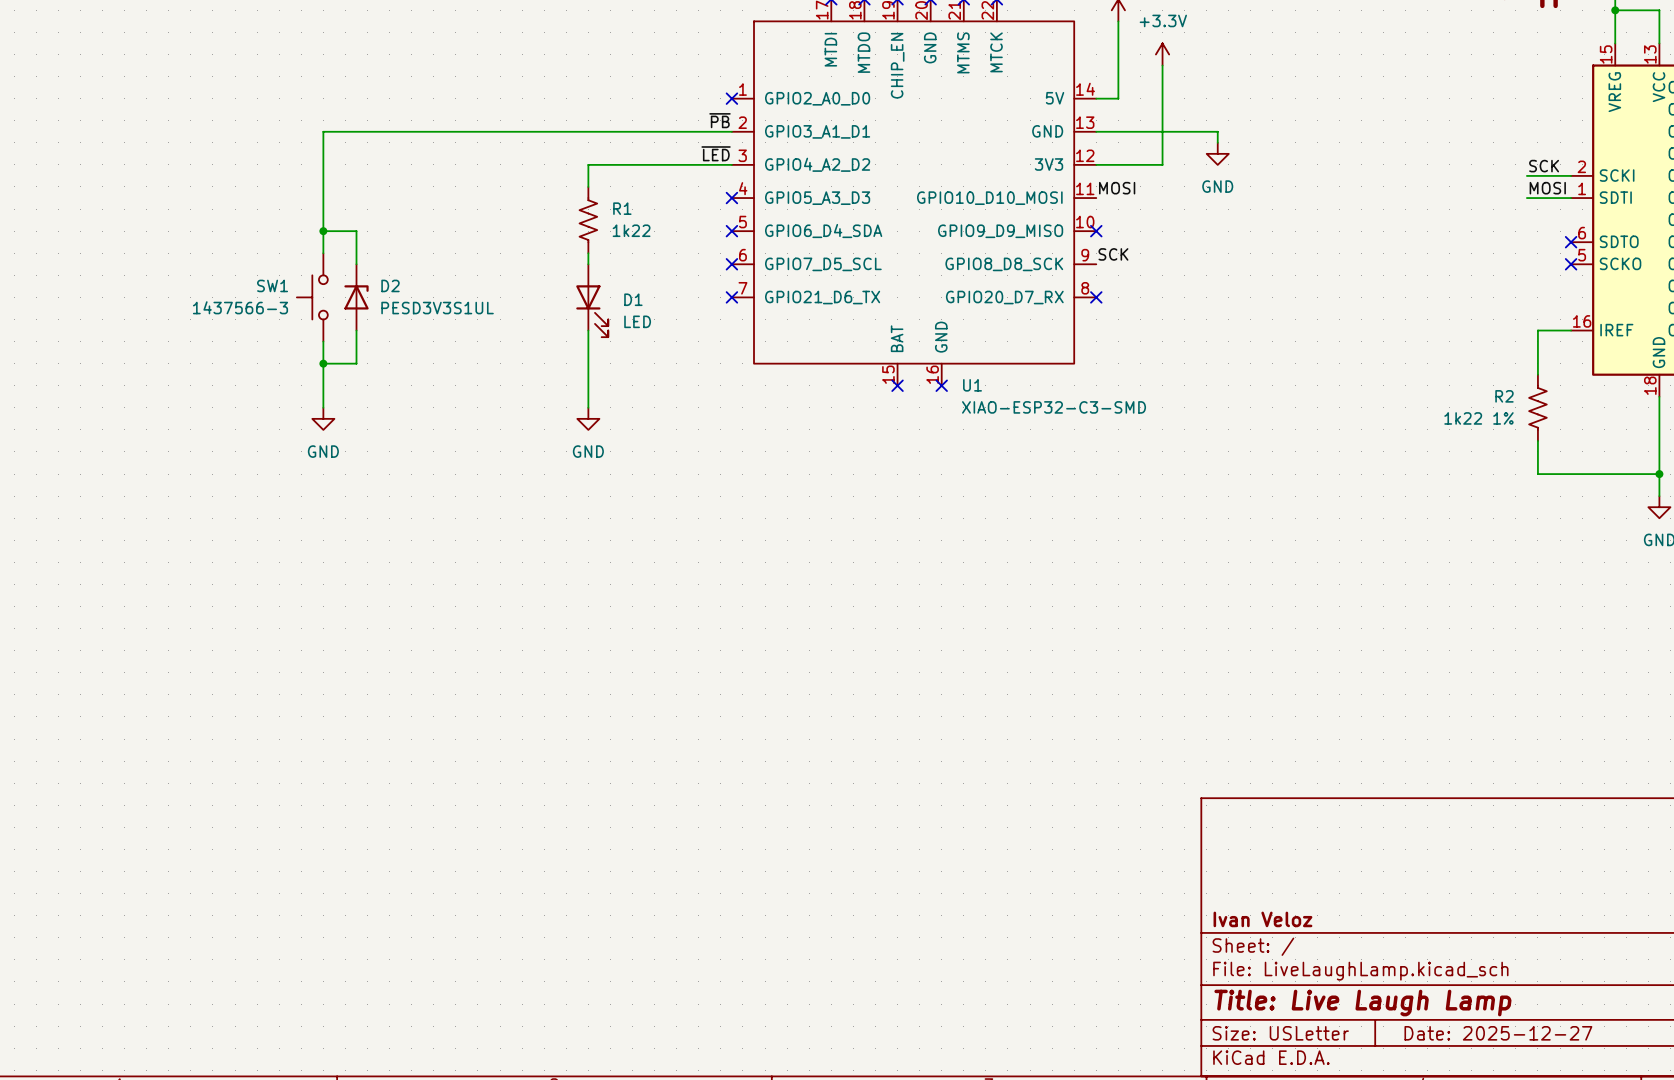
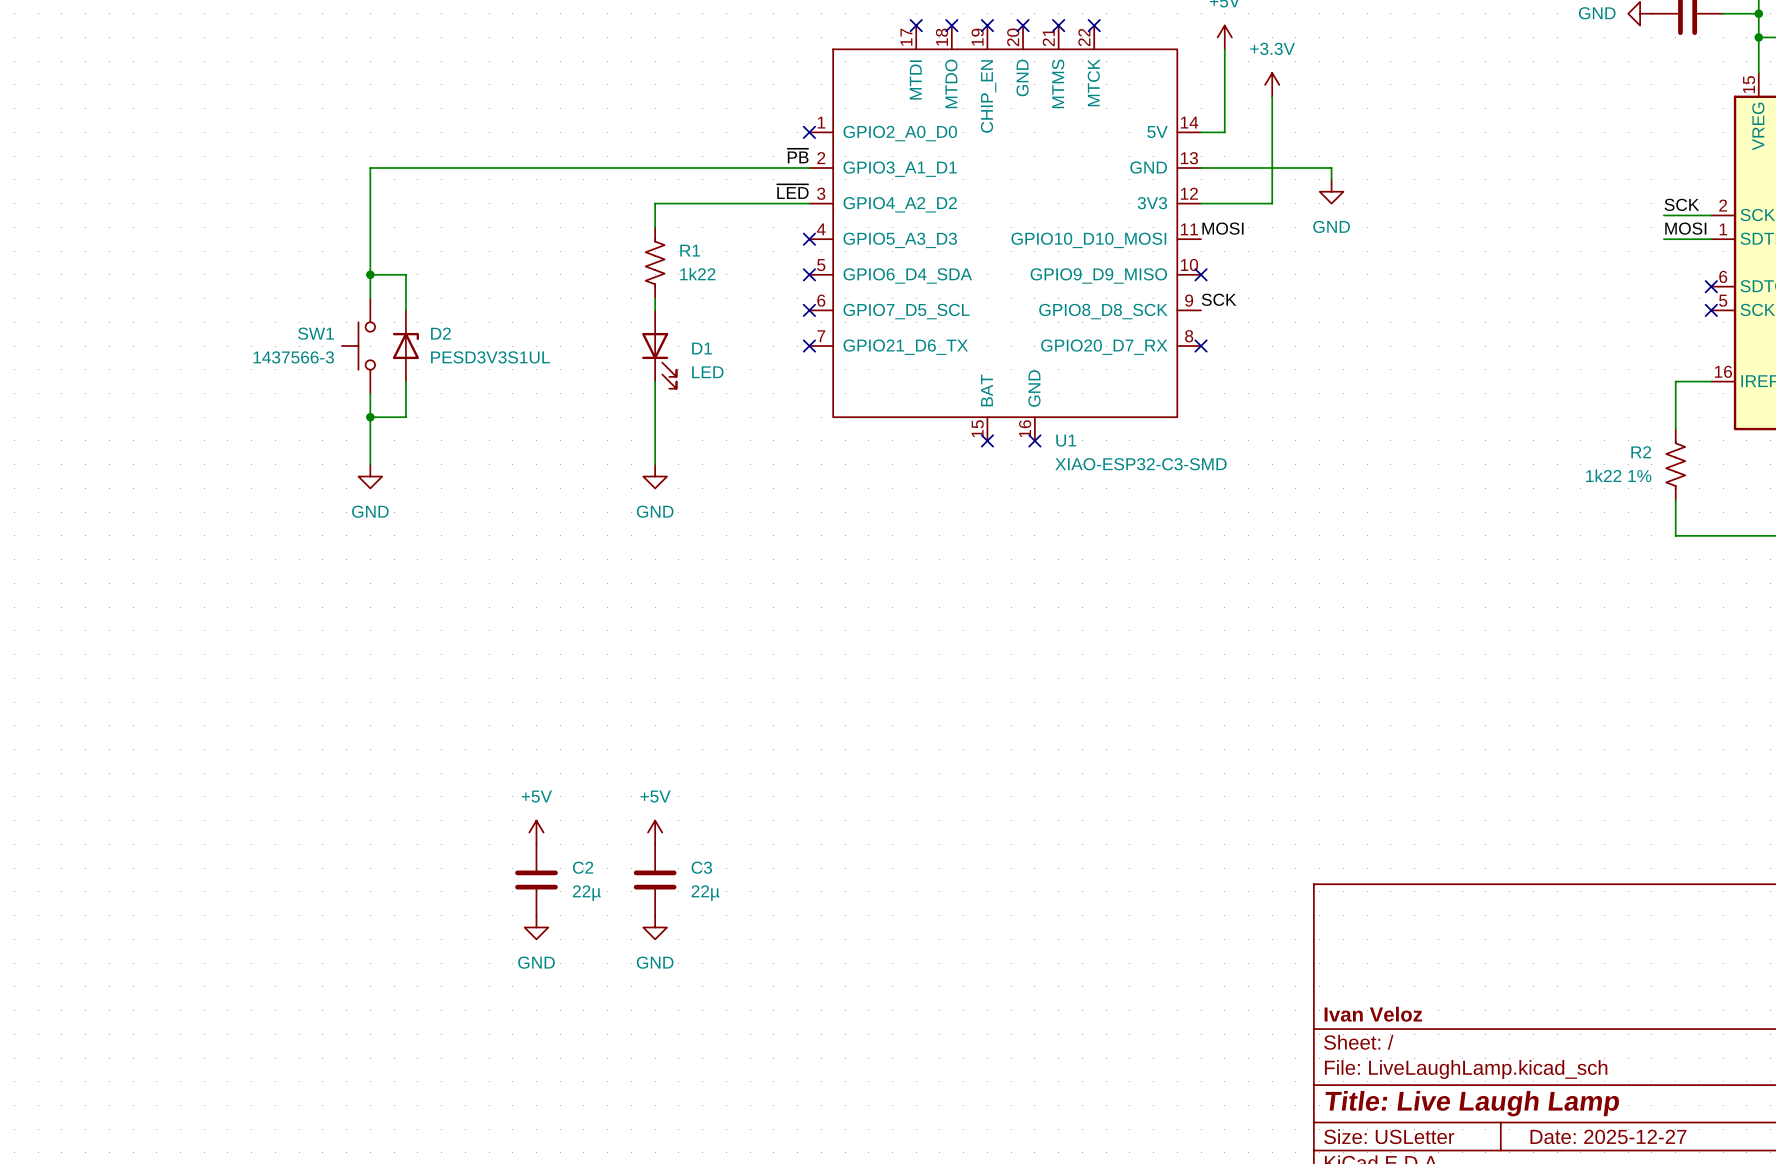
power symbol: none -> +5V (536, 832)
power symbol: none -> +5V (655, 832)
C2: none -> 22µ (536, 880)
C3: none -> 22µ (655, 880)
power symbol: none -> GND (536, 927)
power symbol: none -> GND (655, 927)

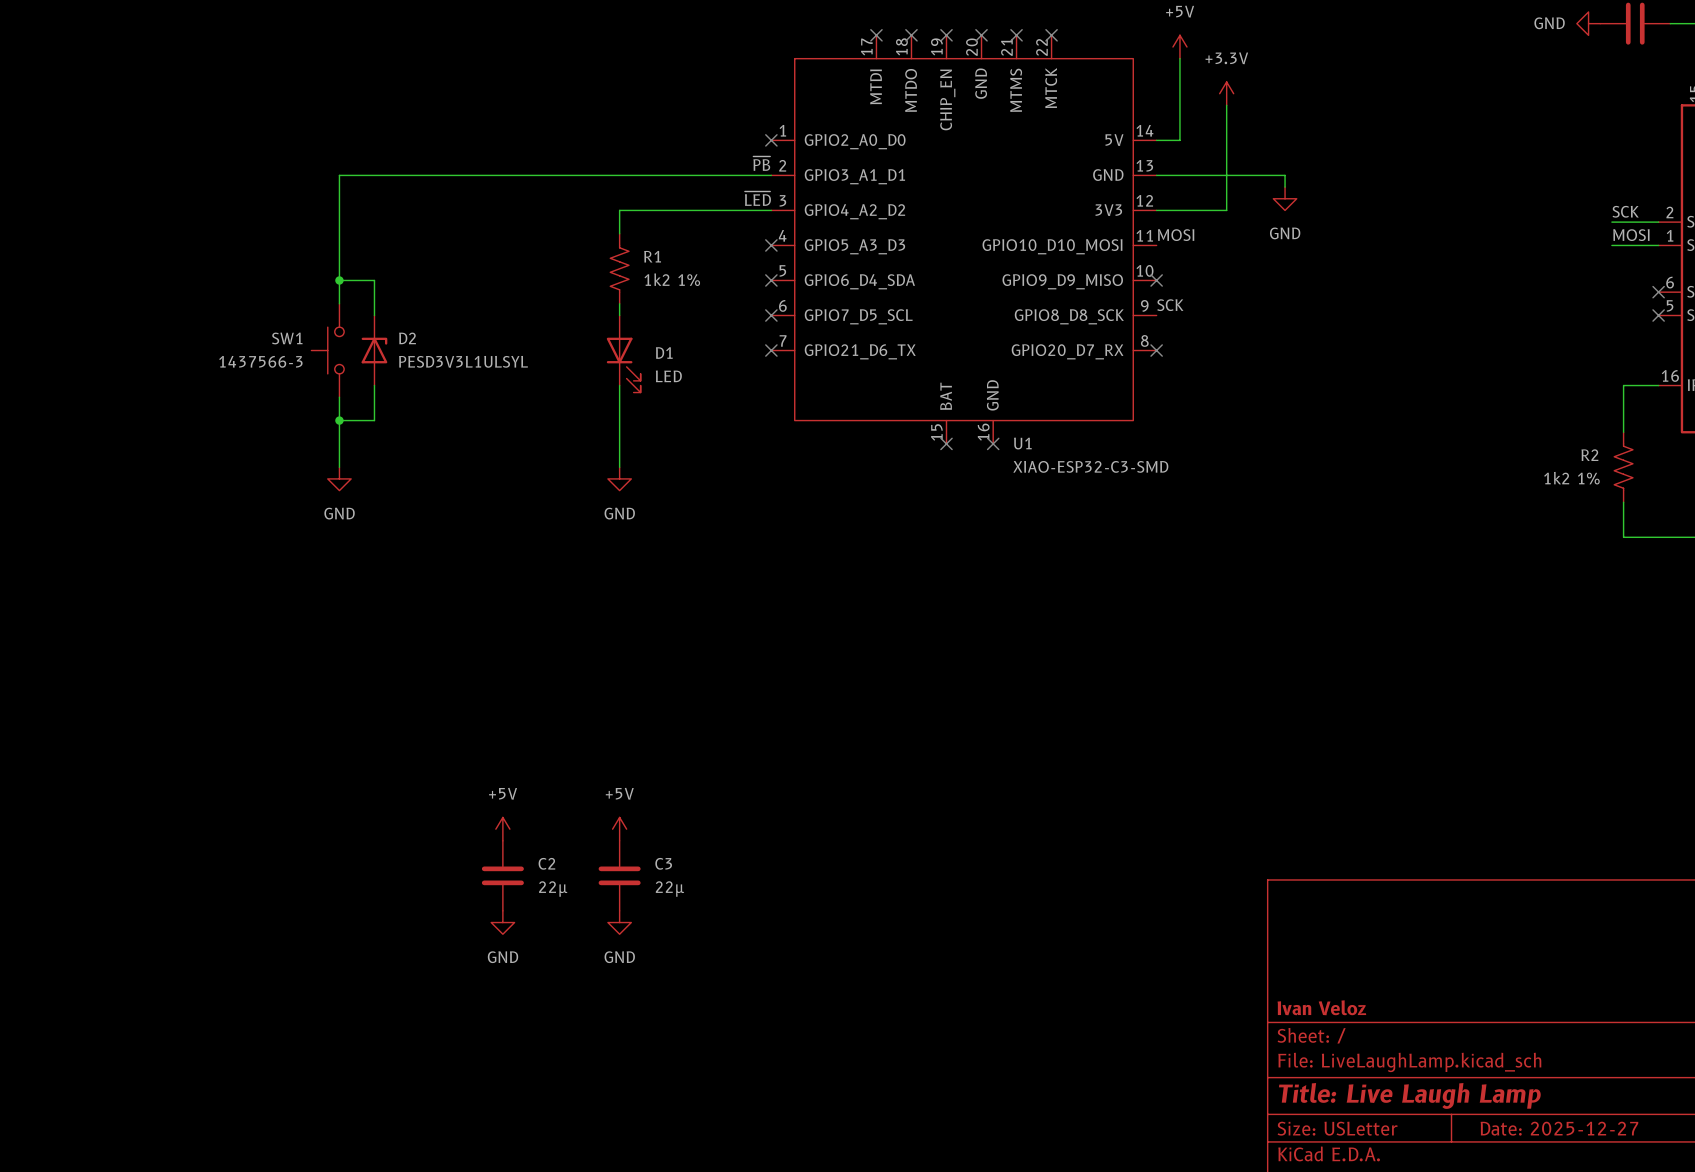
R1 value: 1k22 (697, 274) -> 1k2 1% (672, 279)
D2 value: PESD3V3S1UL (490, 357) -> PESD3V3L1ULSYL (463, 361)
R2 value: 1k22 1% (1618, 475) -> 1k2 1% (1571, 478)

